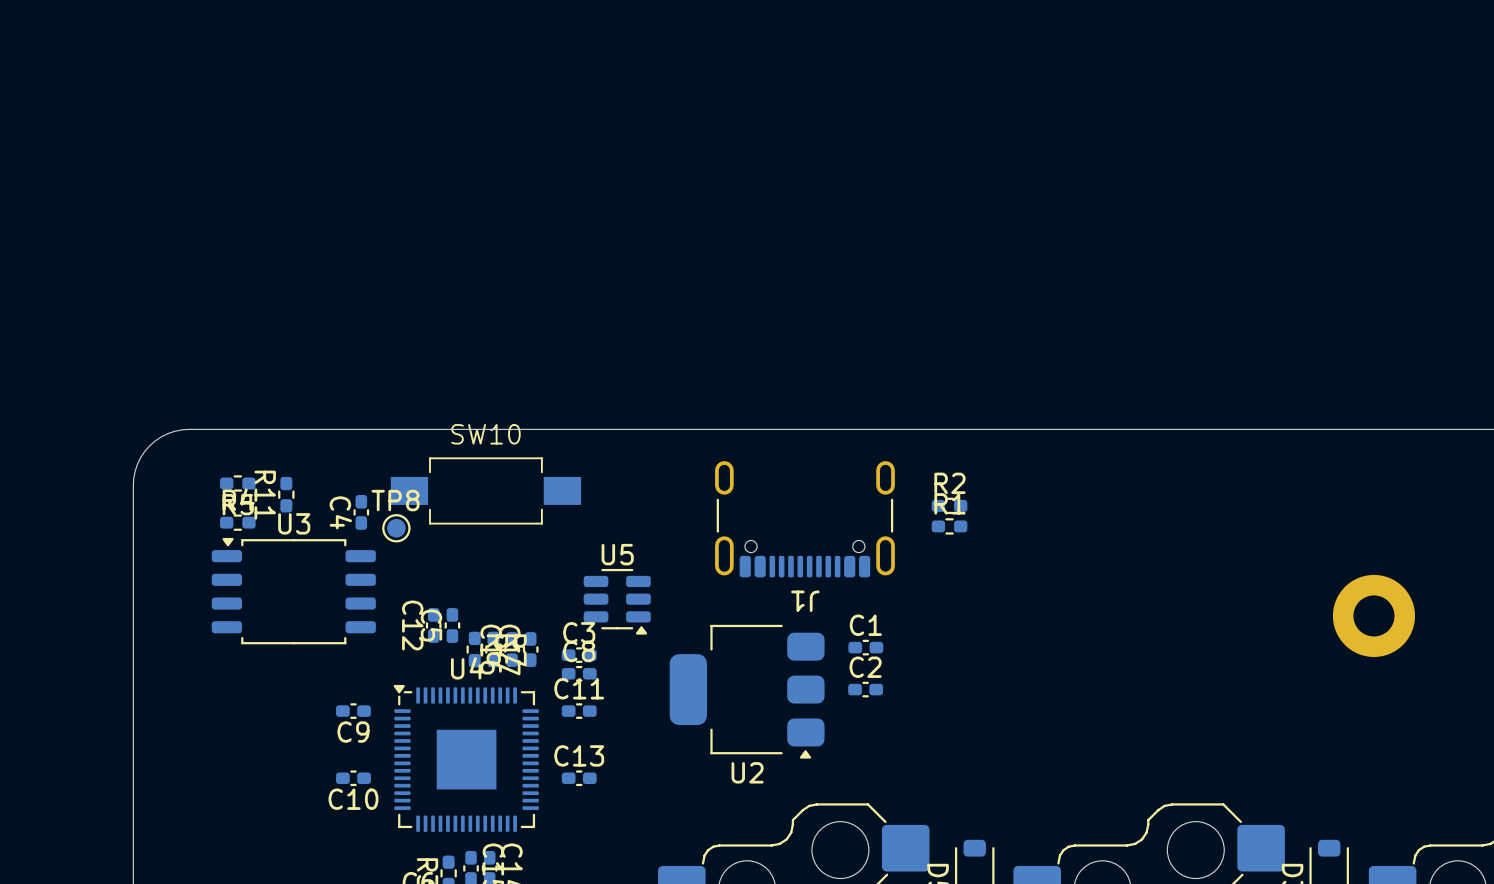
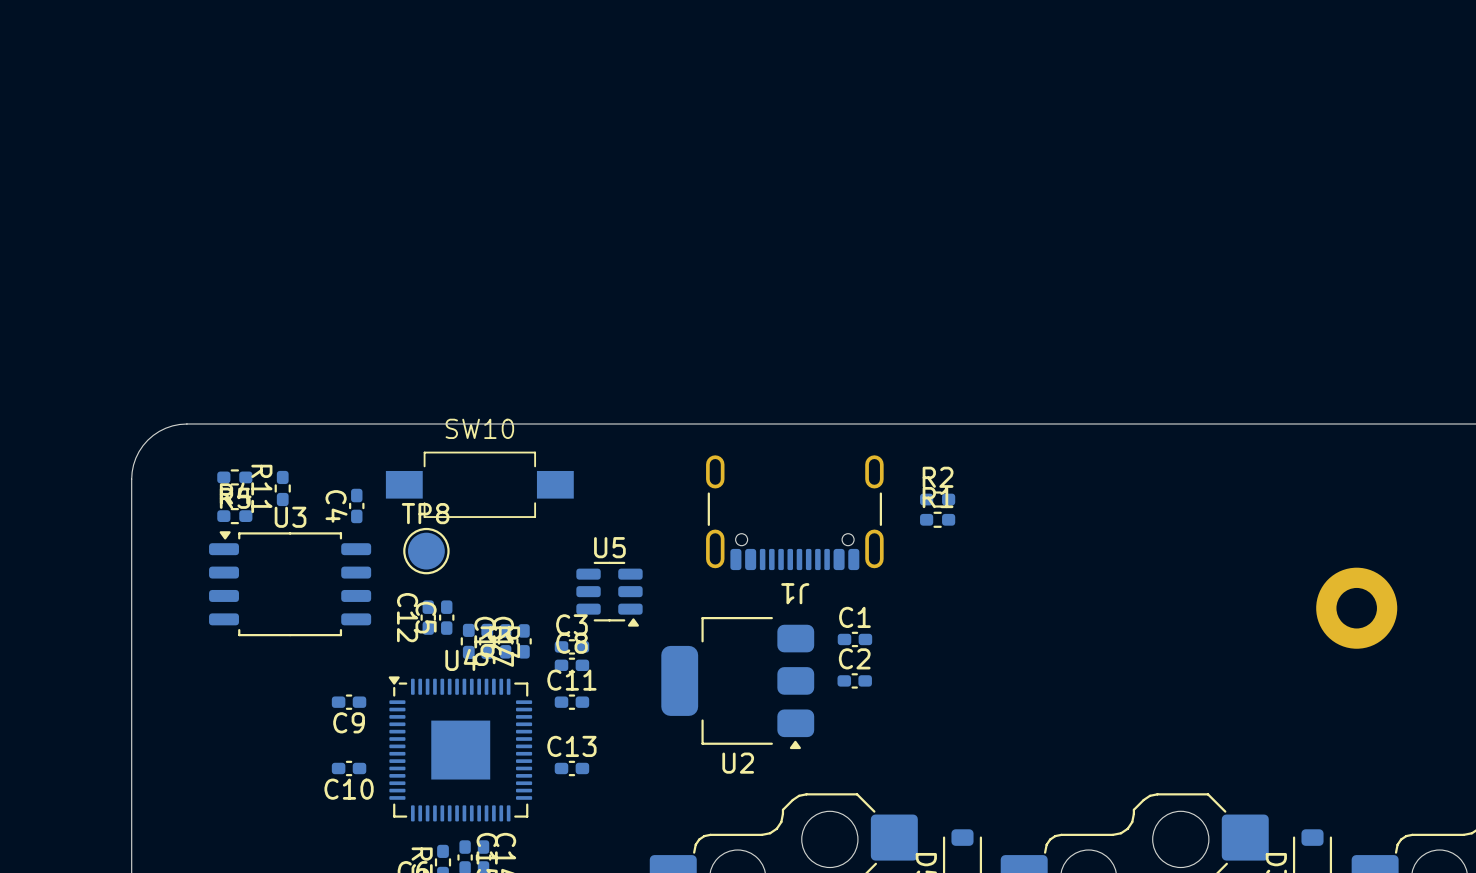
TP8 footprint: [382, 514, 411, 543] -> [403, 527, 450, 575]

